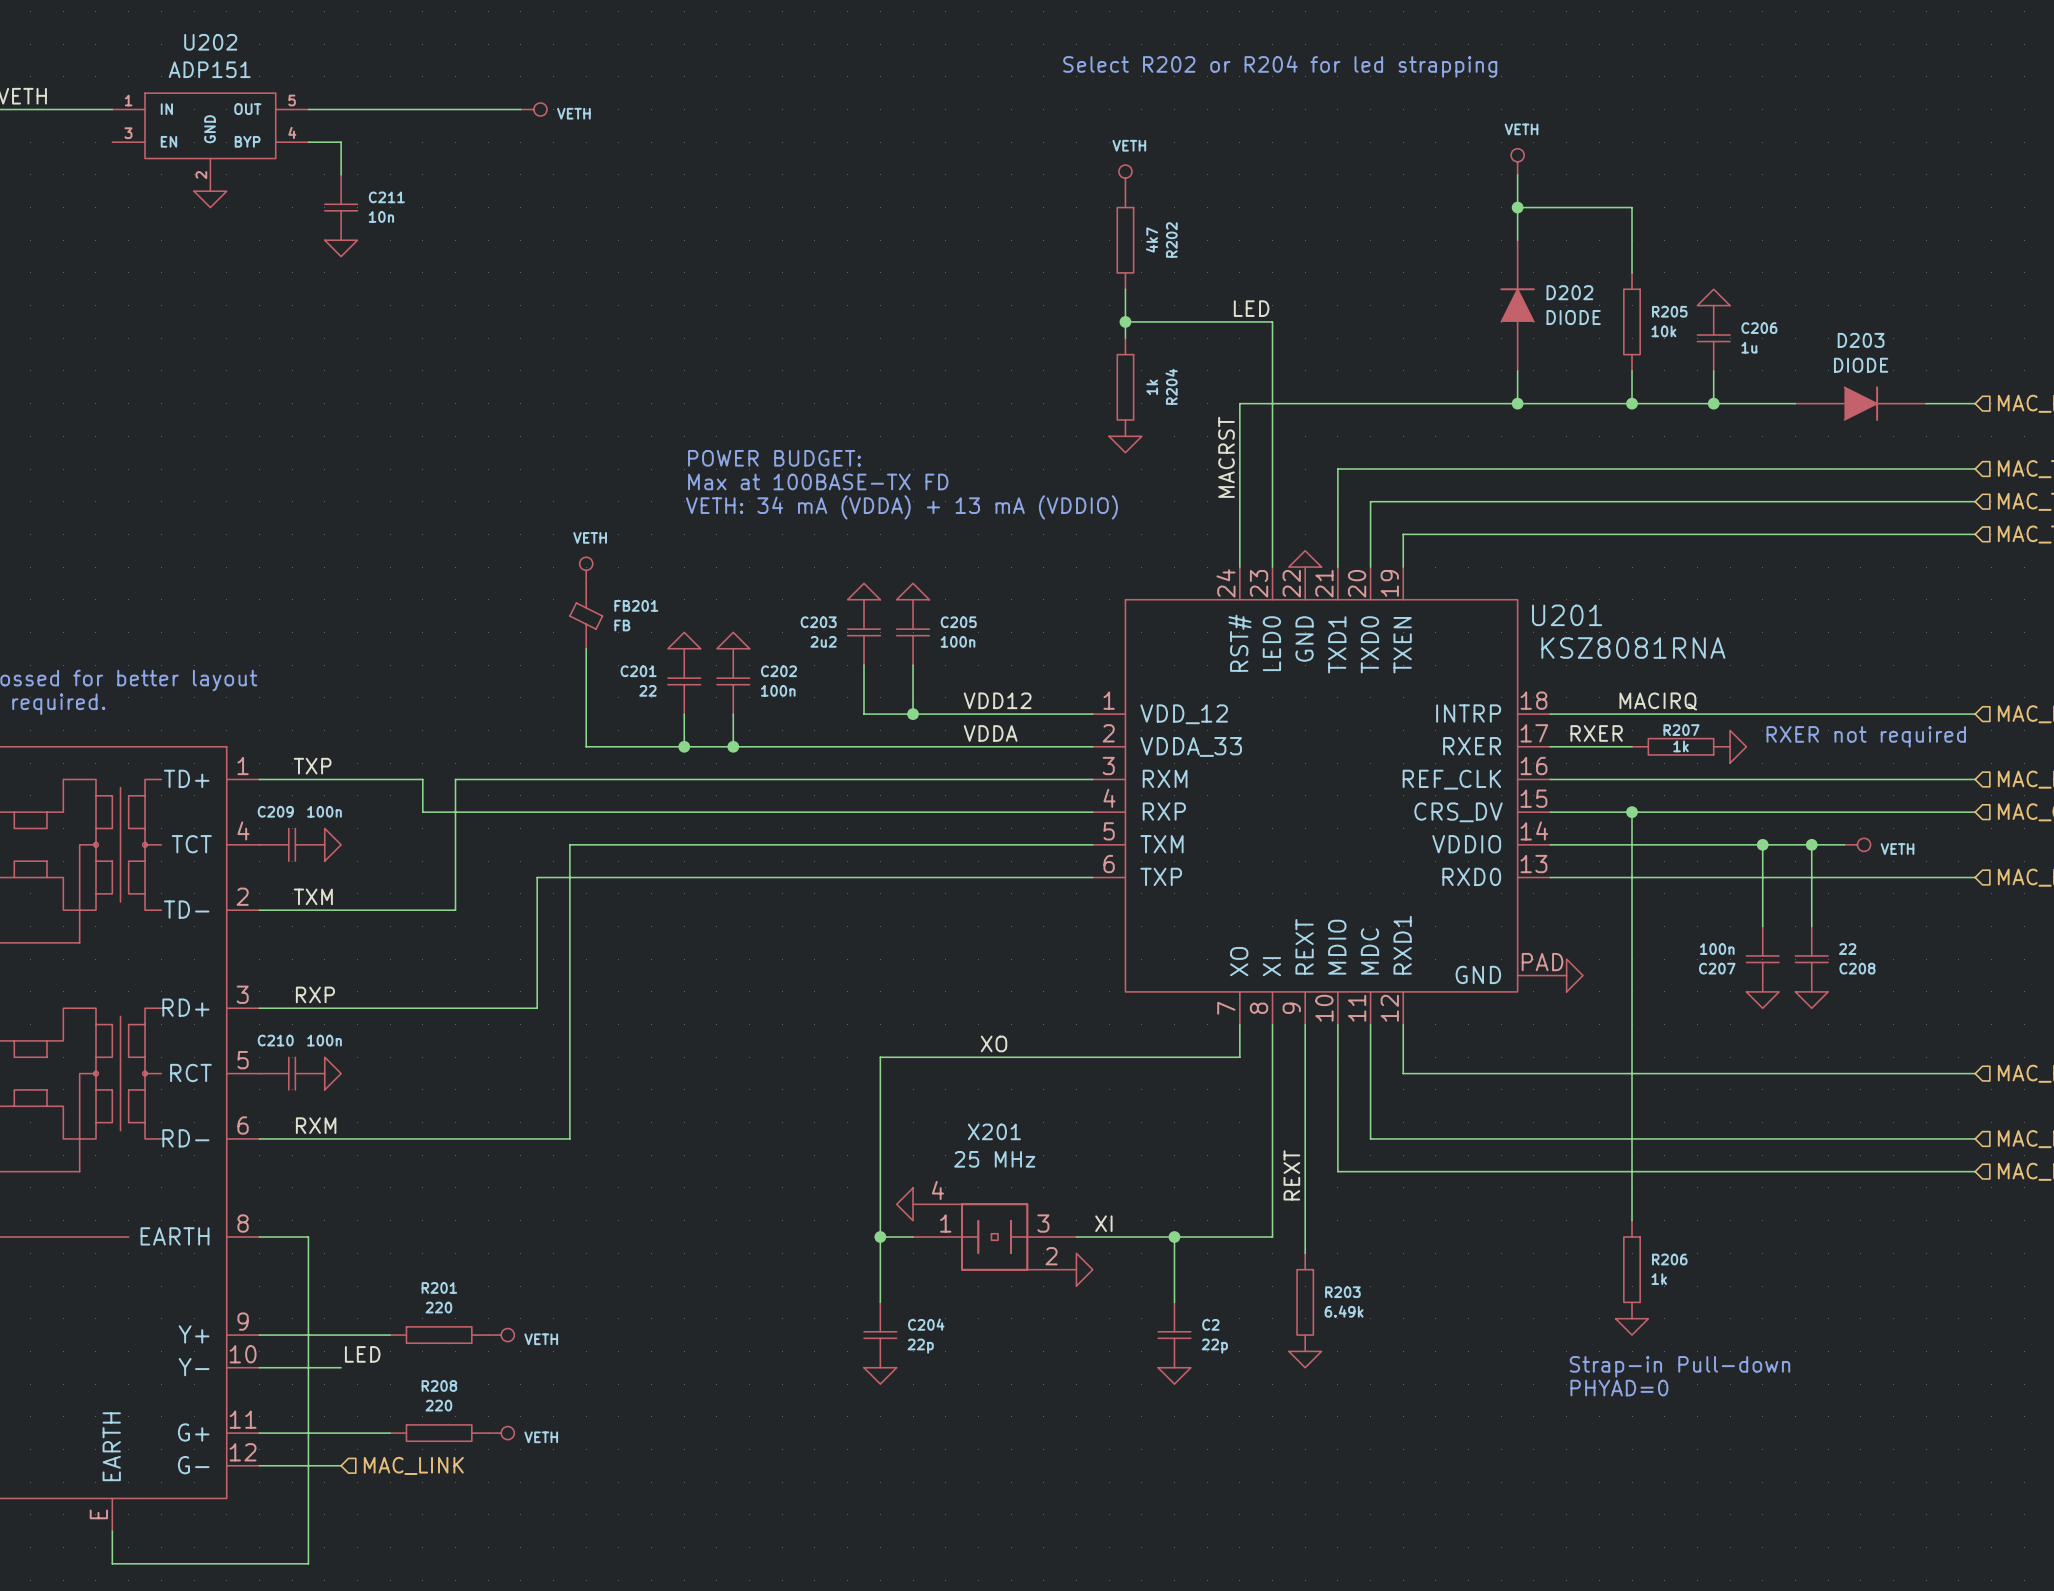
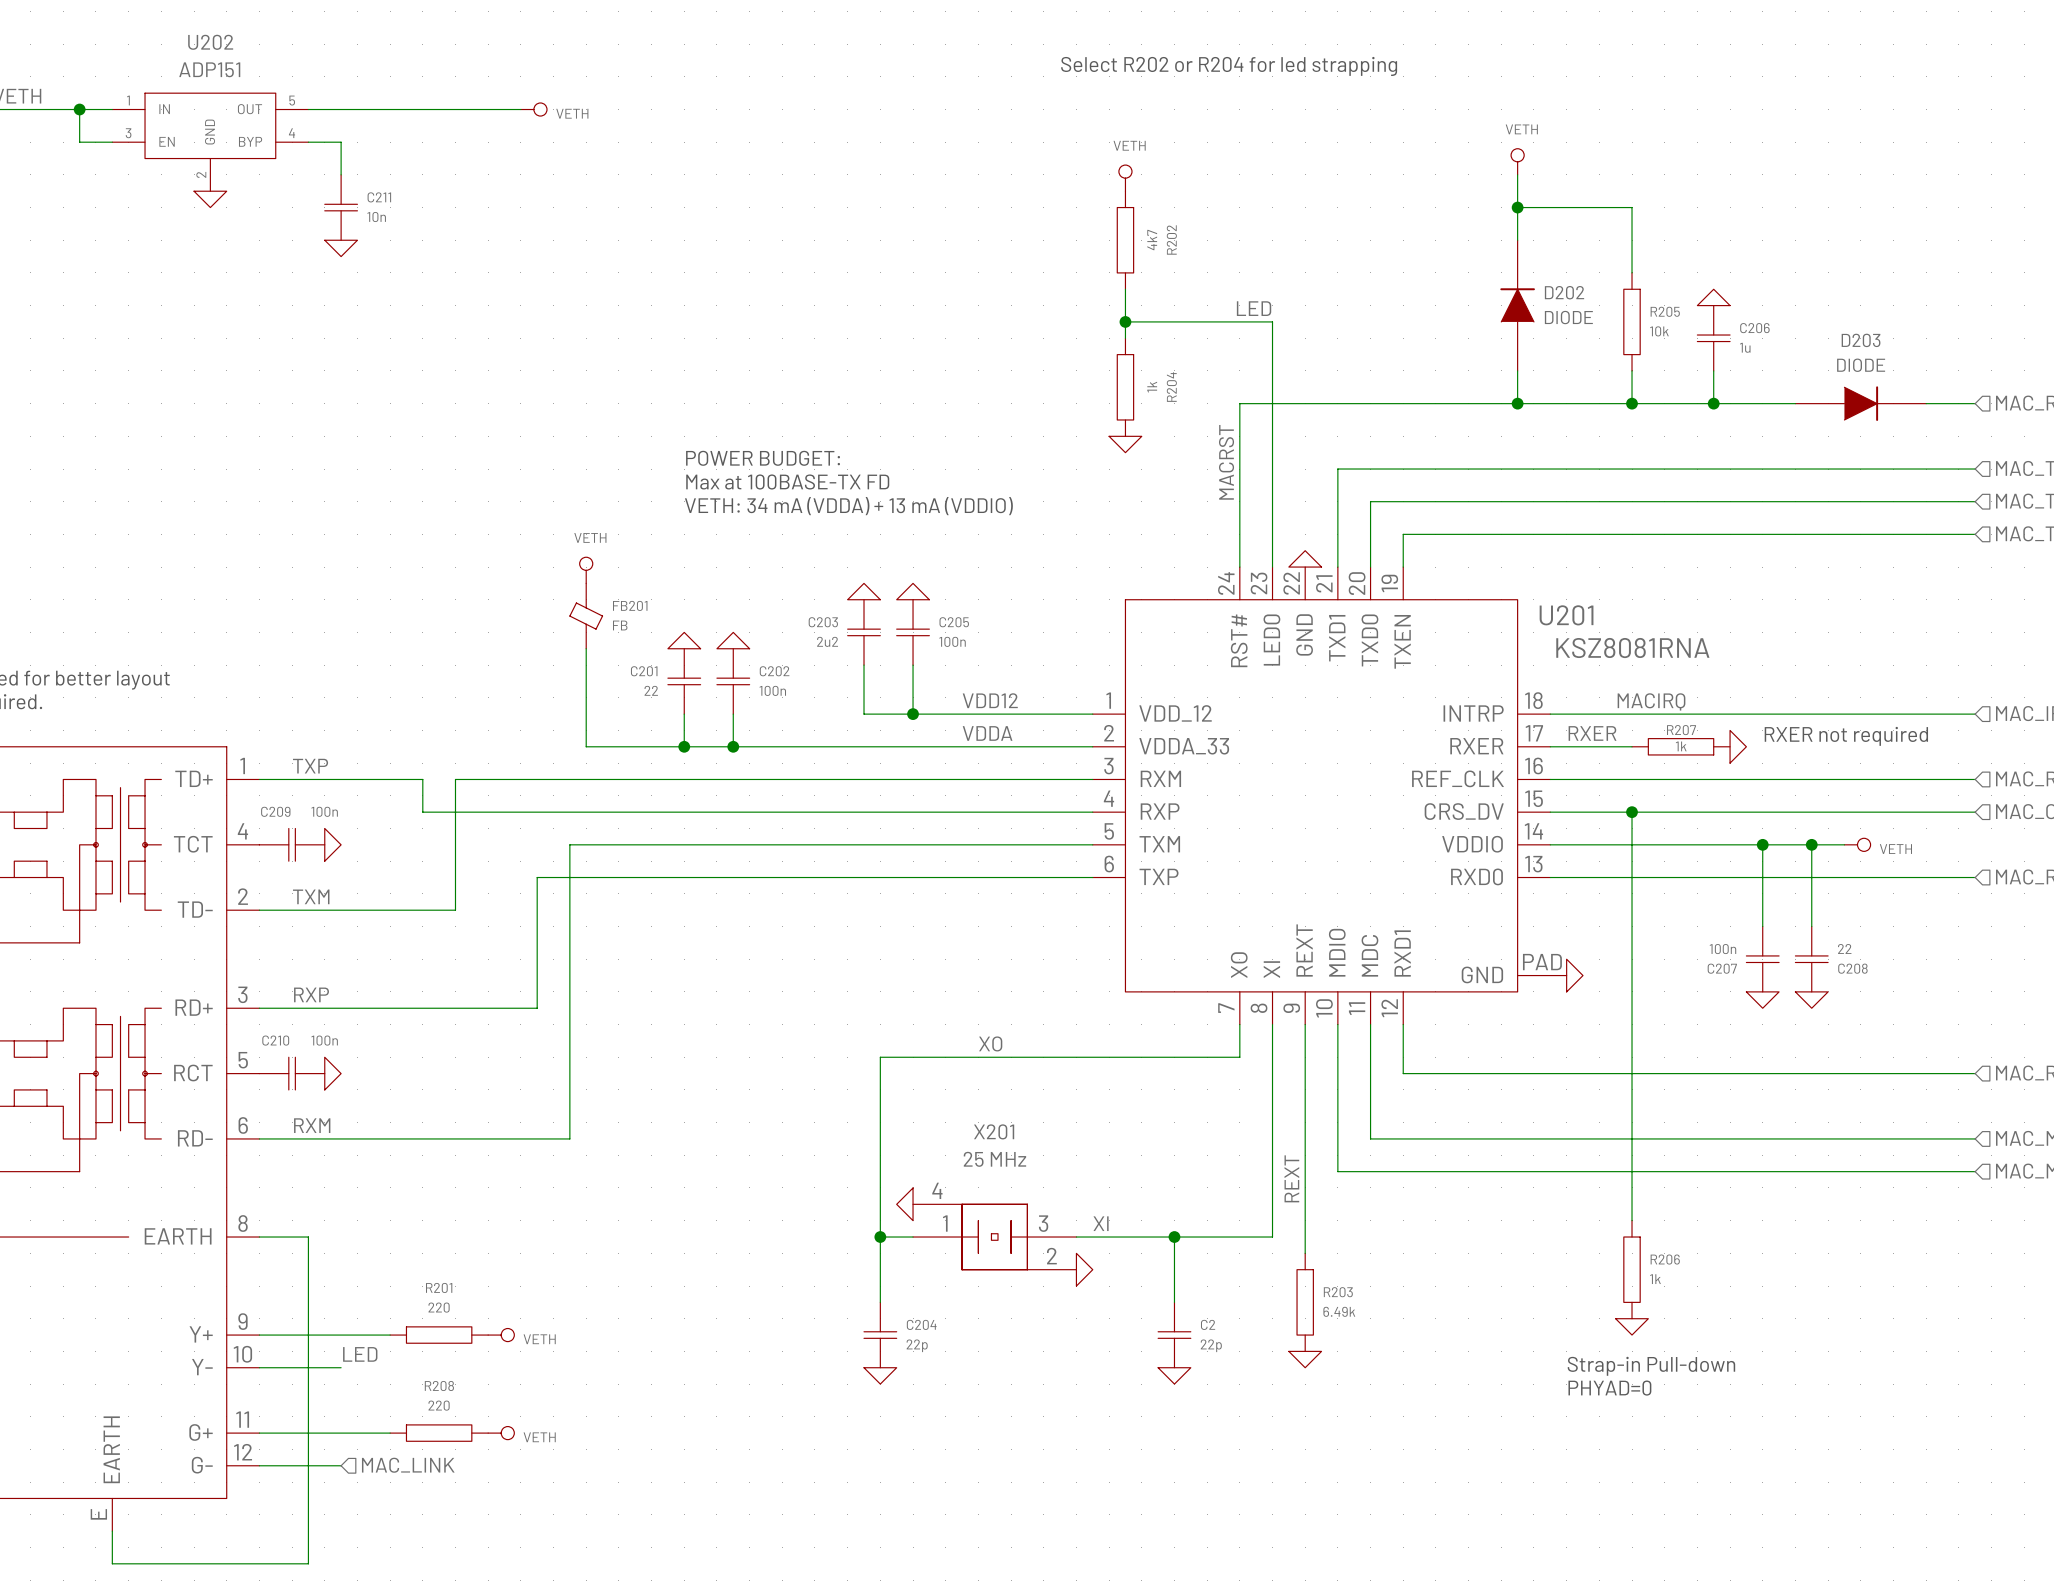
wire: none -> (79, 109) (79, 142) (112, 142)
junction: none -> (79, 109)

